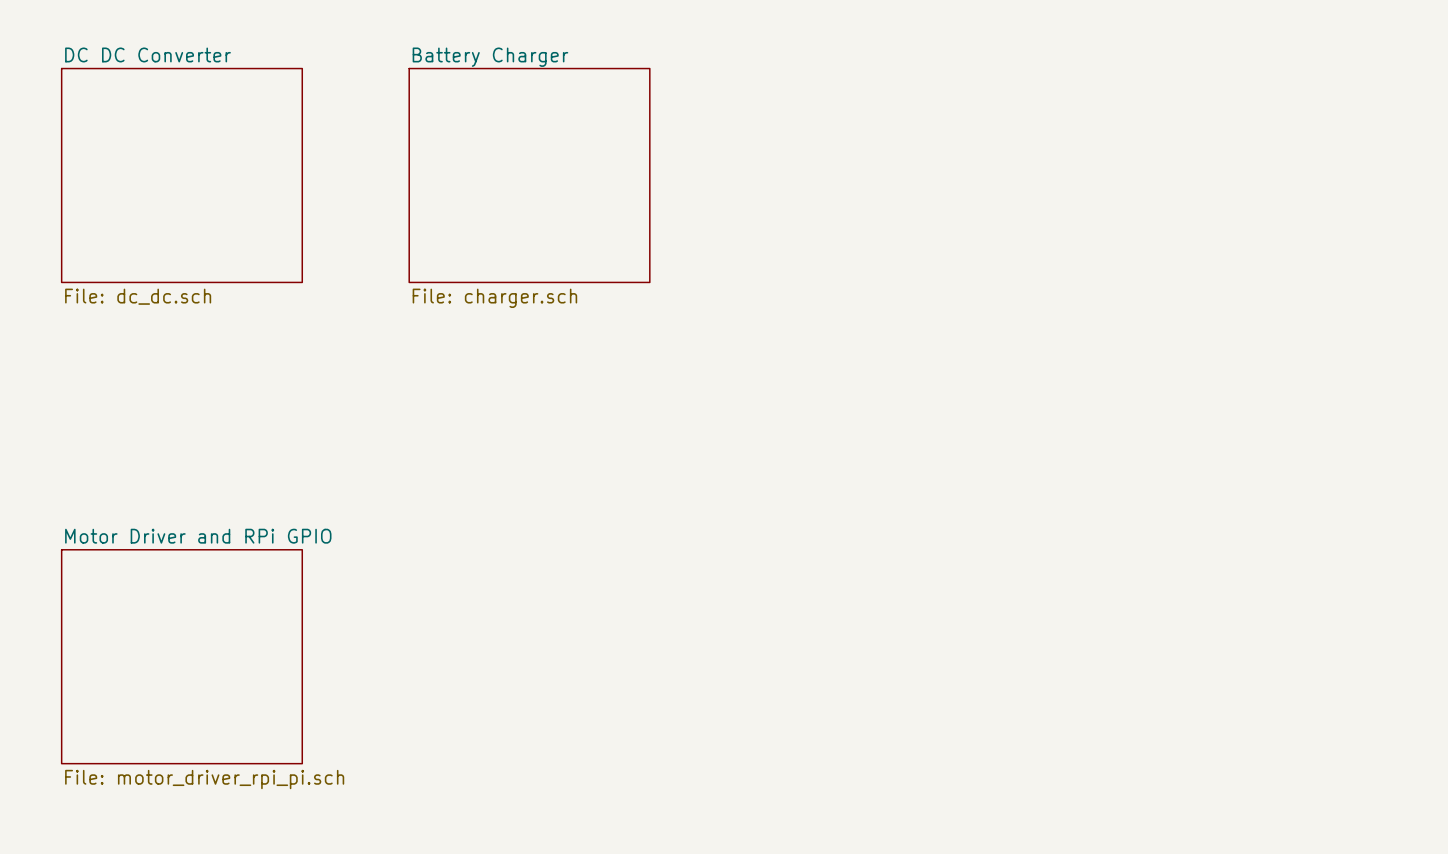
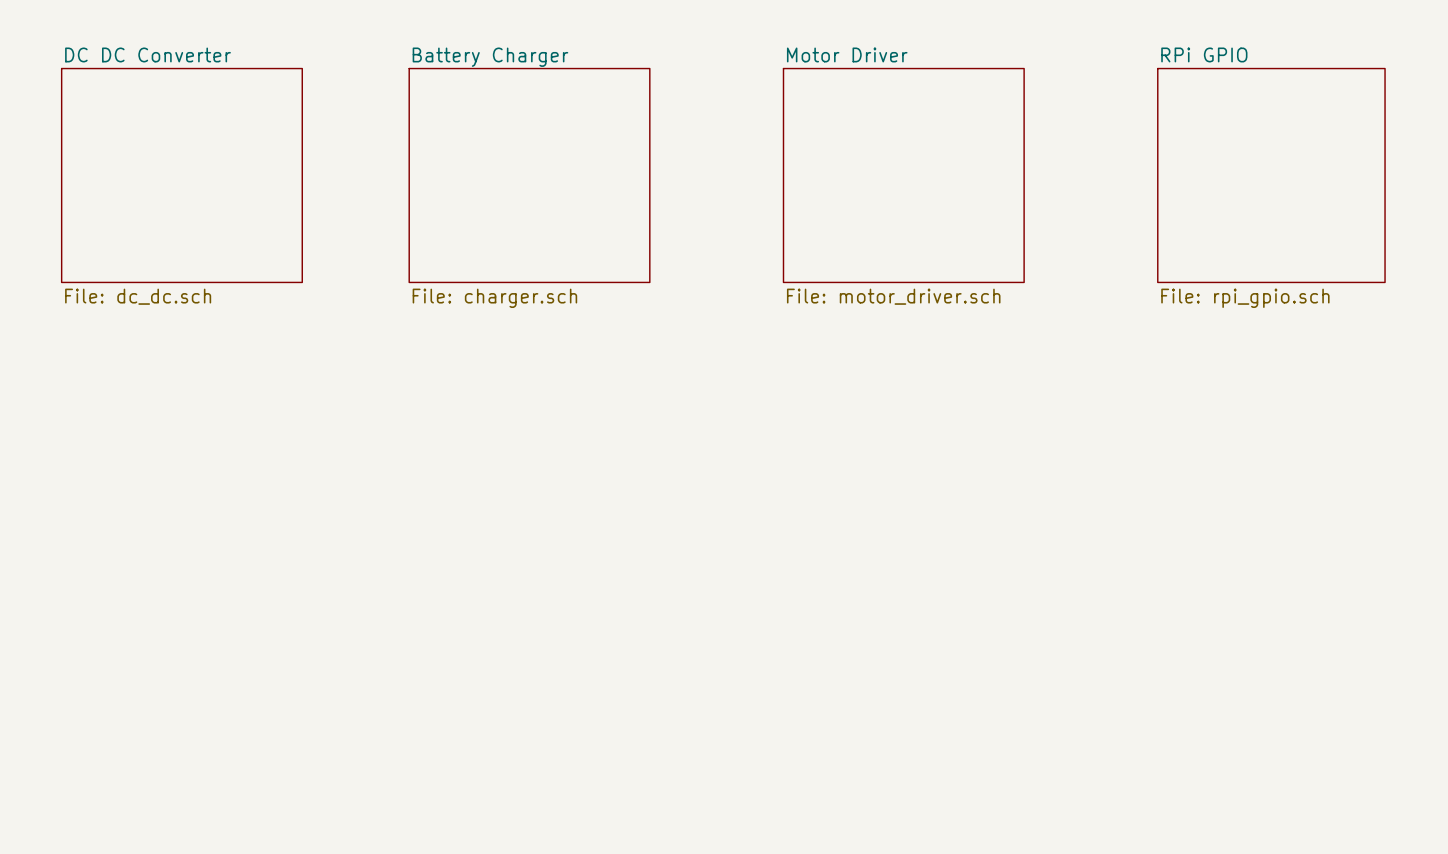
sheet Motor Driver: none -> File: motor_driver.sch (903, 175)
sheet RPi GPIO: none -> File: rpi_gpio.sch (1271, 175)
sheet Motor Driver and RPi GPIO: File: motor_driver_rpi_pi.sch (181, 656) -> none

